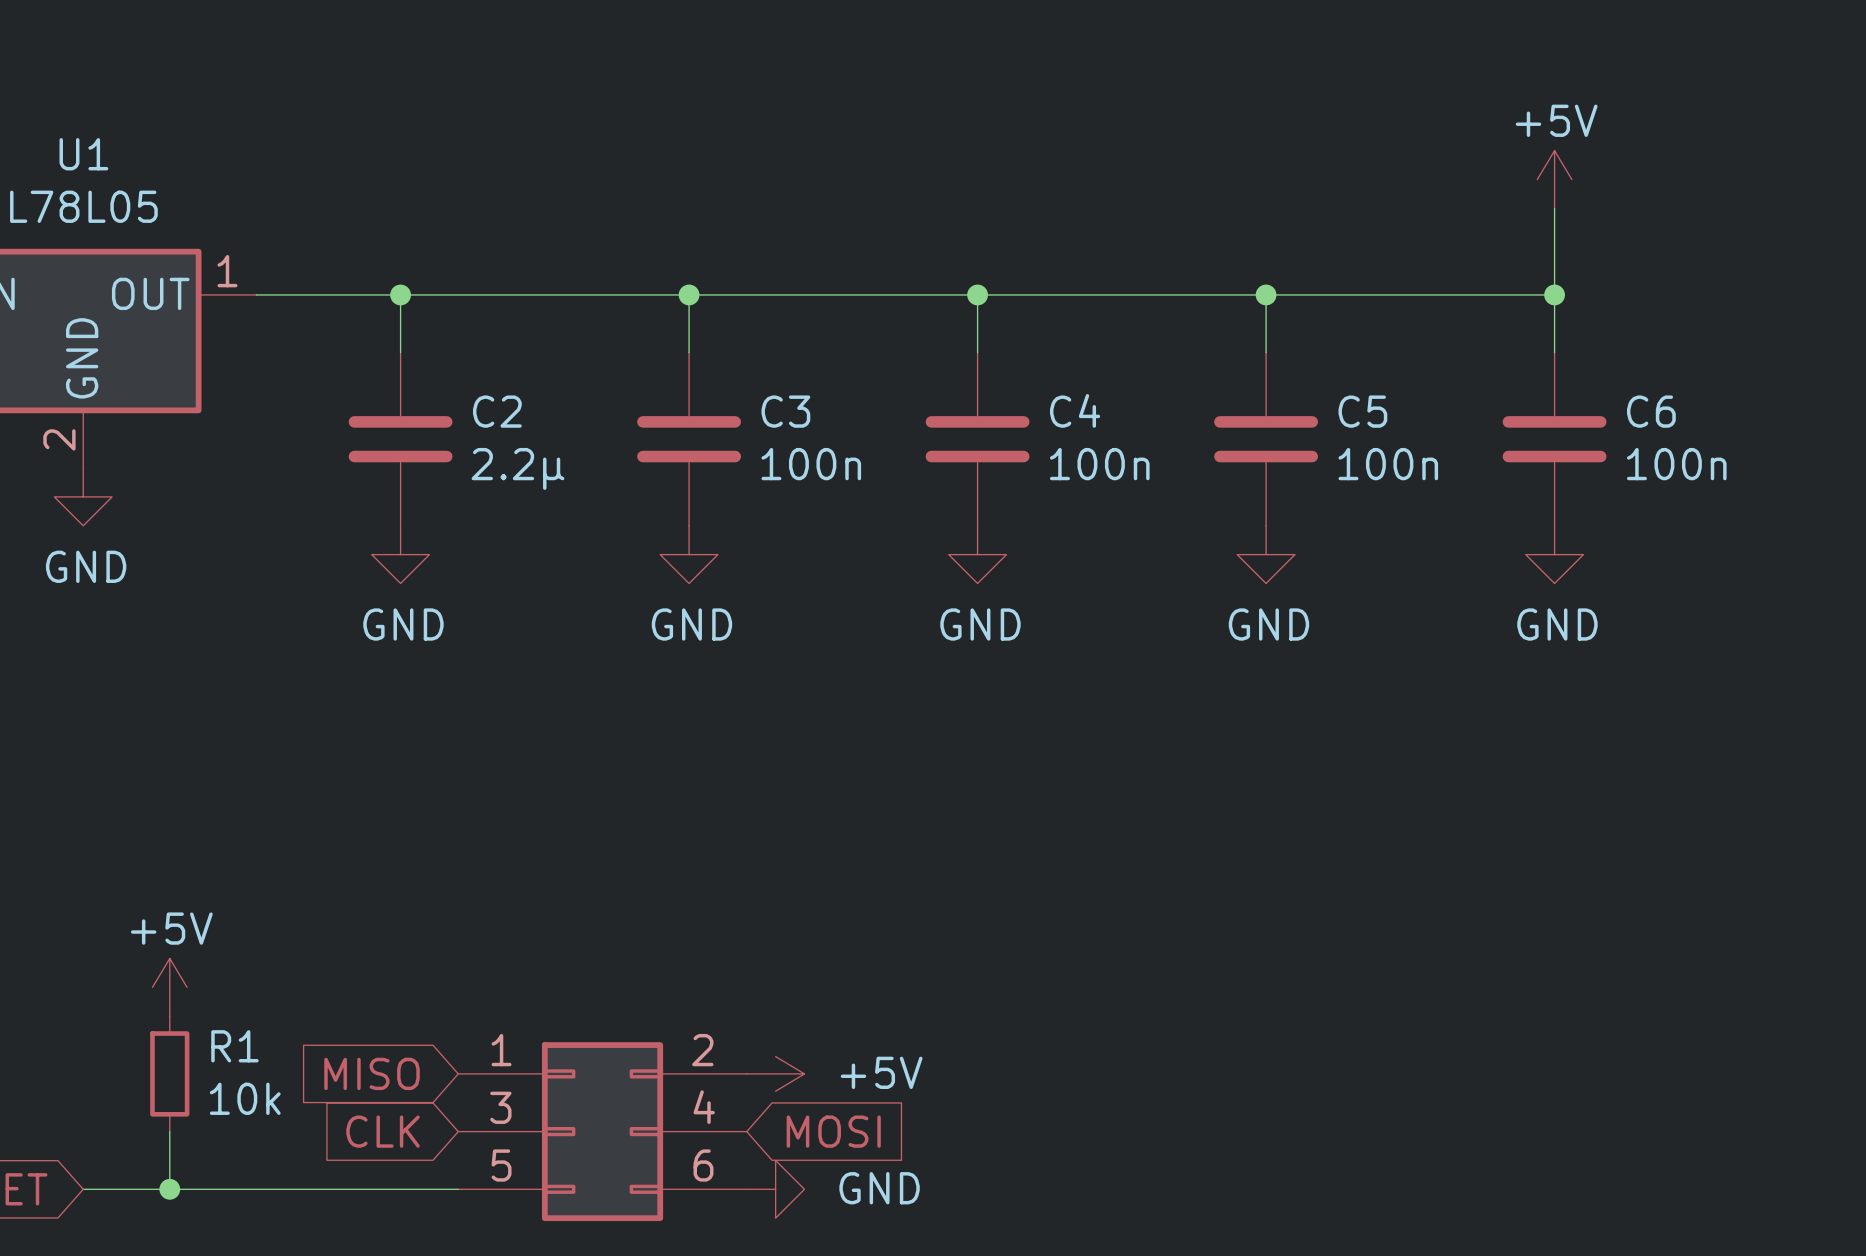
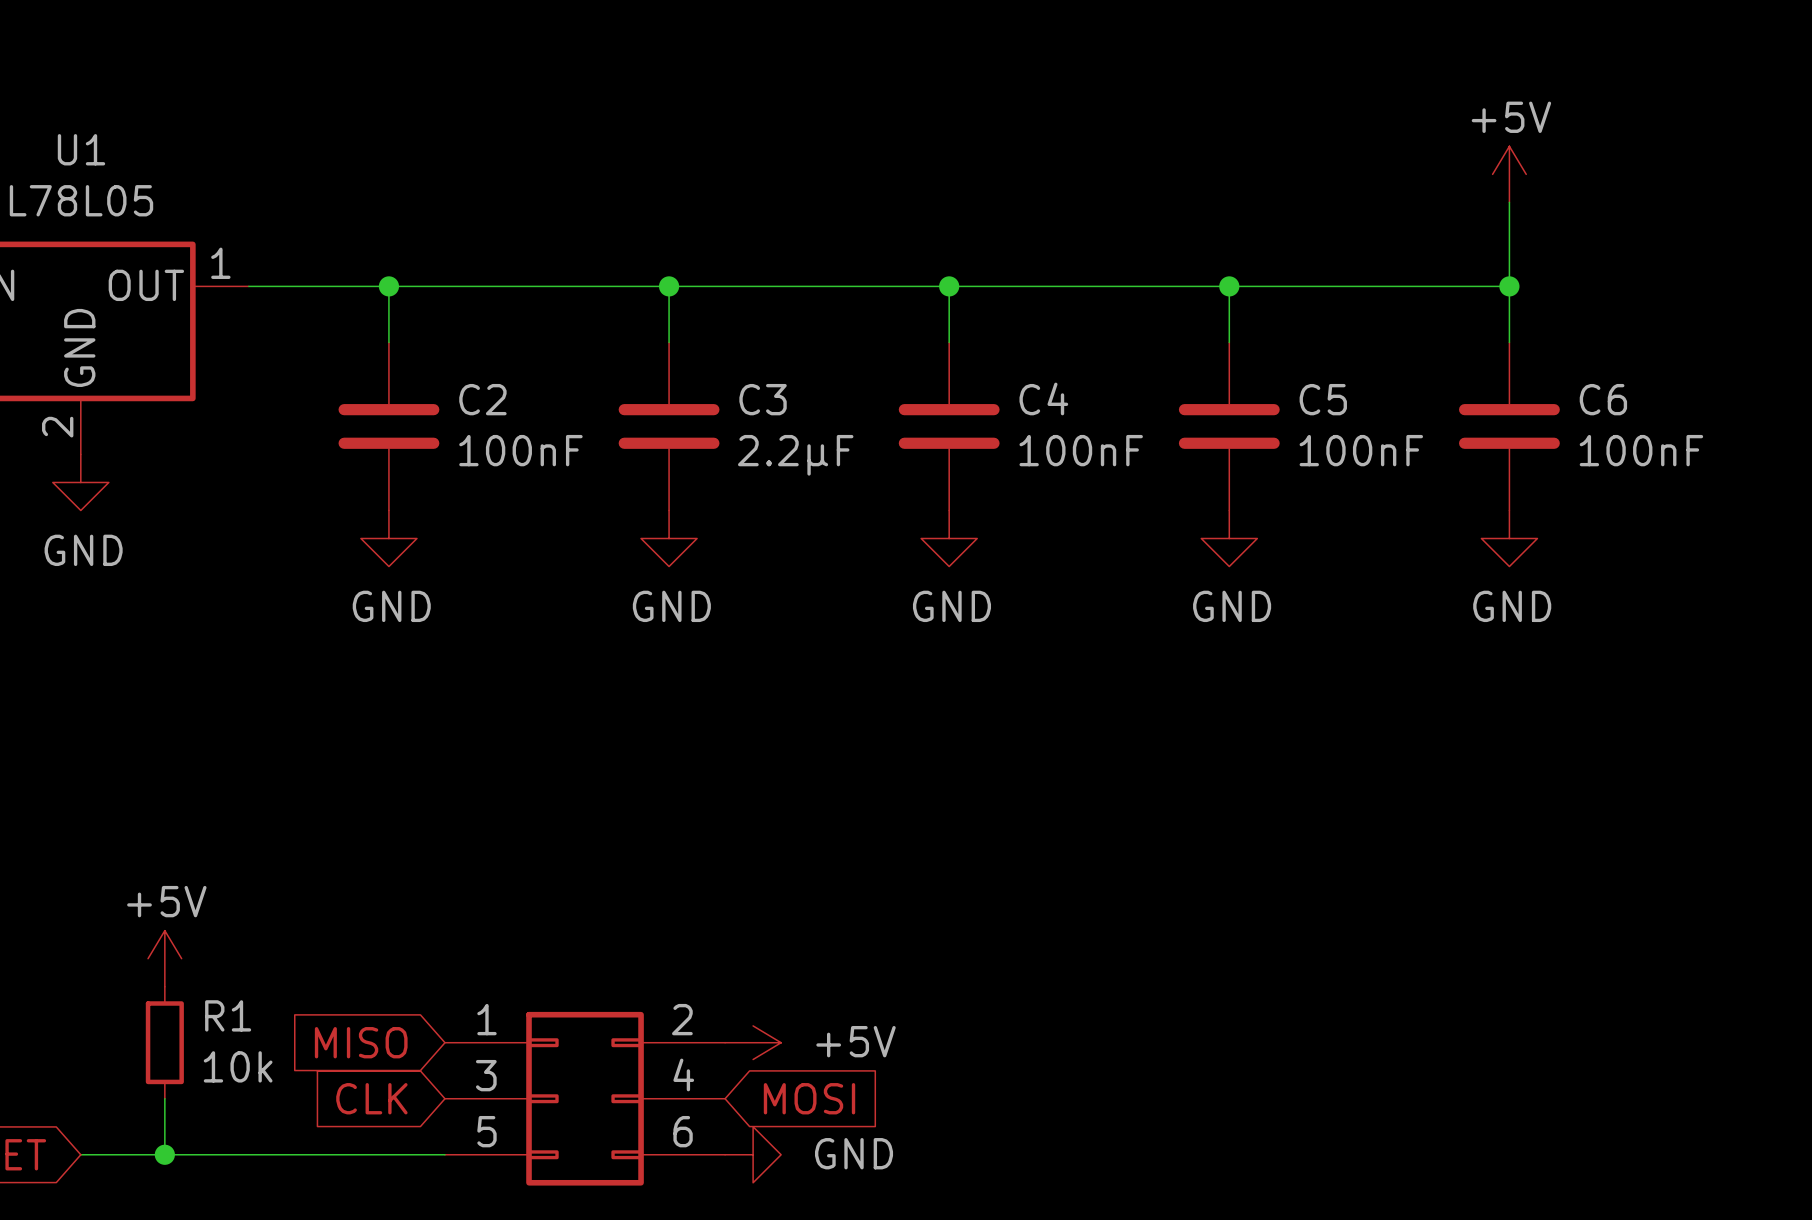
C3 value: 100n (811, 464) -> 2.2µF (795, 455)
C4 value: 100n (1099, 464) -> 100nF (1081, 450)
C5 value: 100n (1388, 464) -> 100nF (1361, 450)
C6 value: 100n (1676, 464) -> 100nF (1641, 450)
C2 value: 2.2µ (517, 468) -> 100nF (520, 450)

